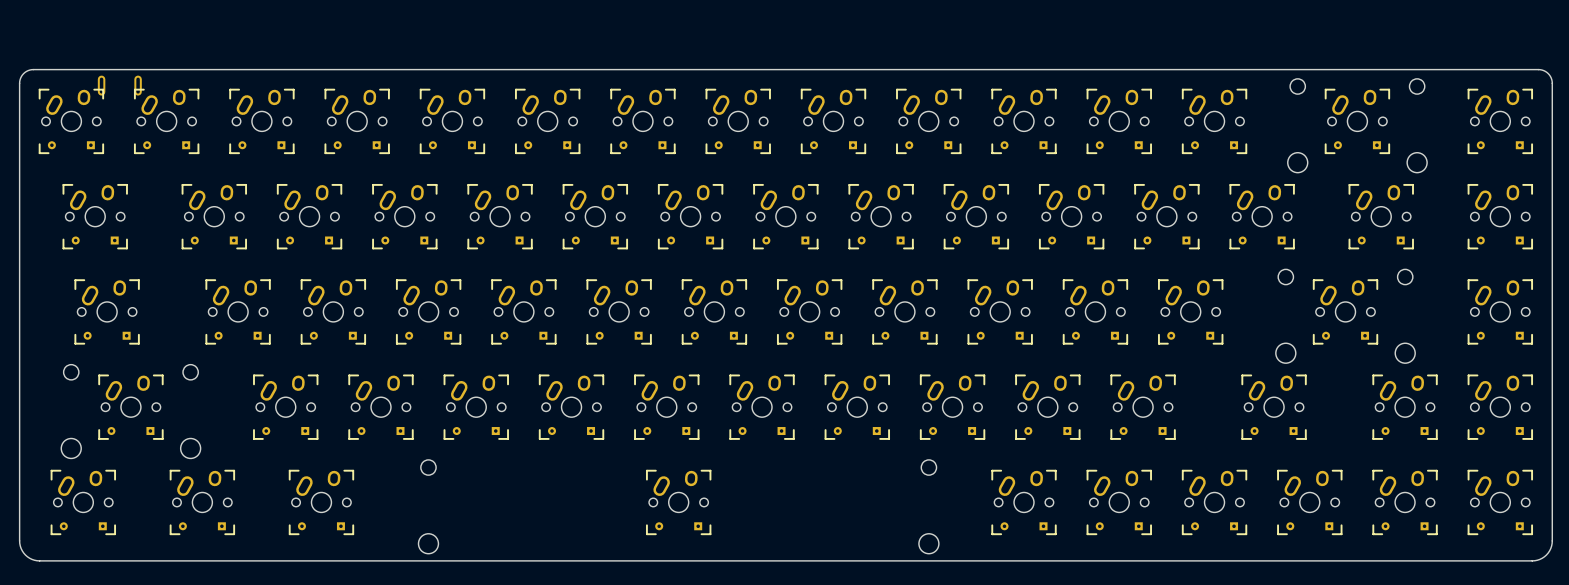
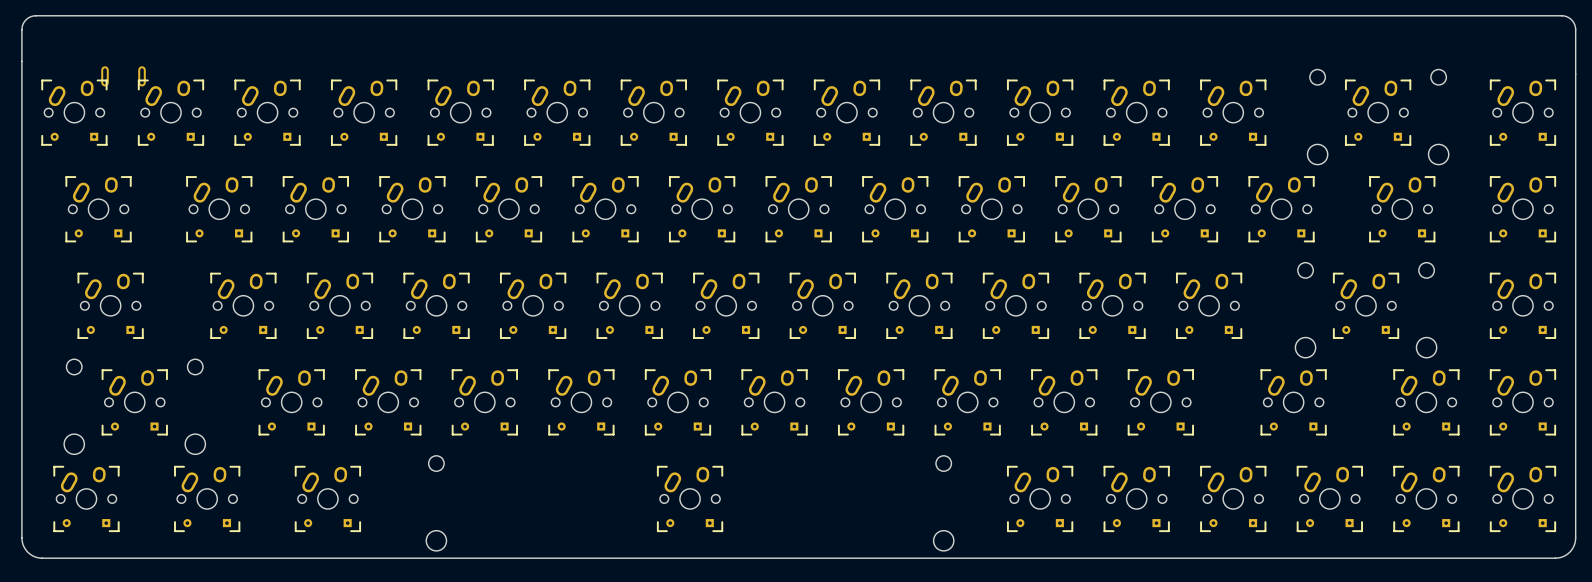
board edge: (19, 83) (23, 73) (33, 69) (1538, 69) (1548, 73) (1552, 83) -> (21, 74) (22, 26) (27, 18) (35, 15) (1561, 15) (1570, 18) (1575, 26) (1575, 74)

